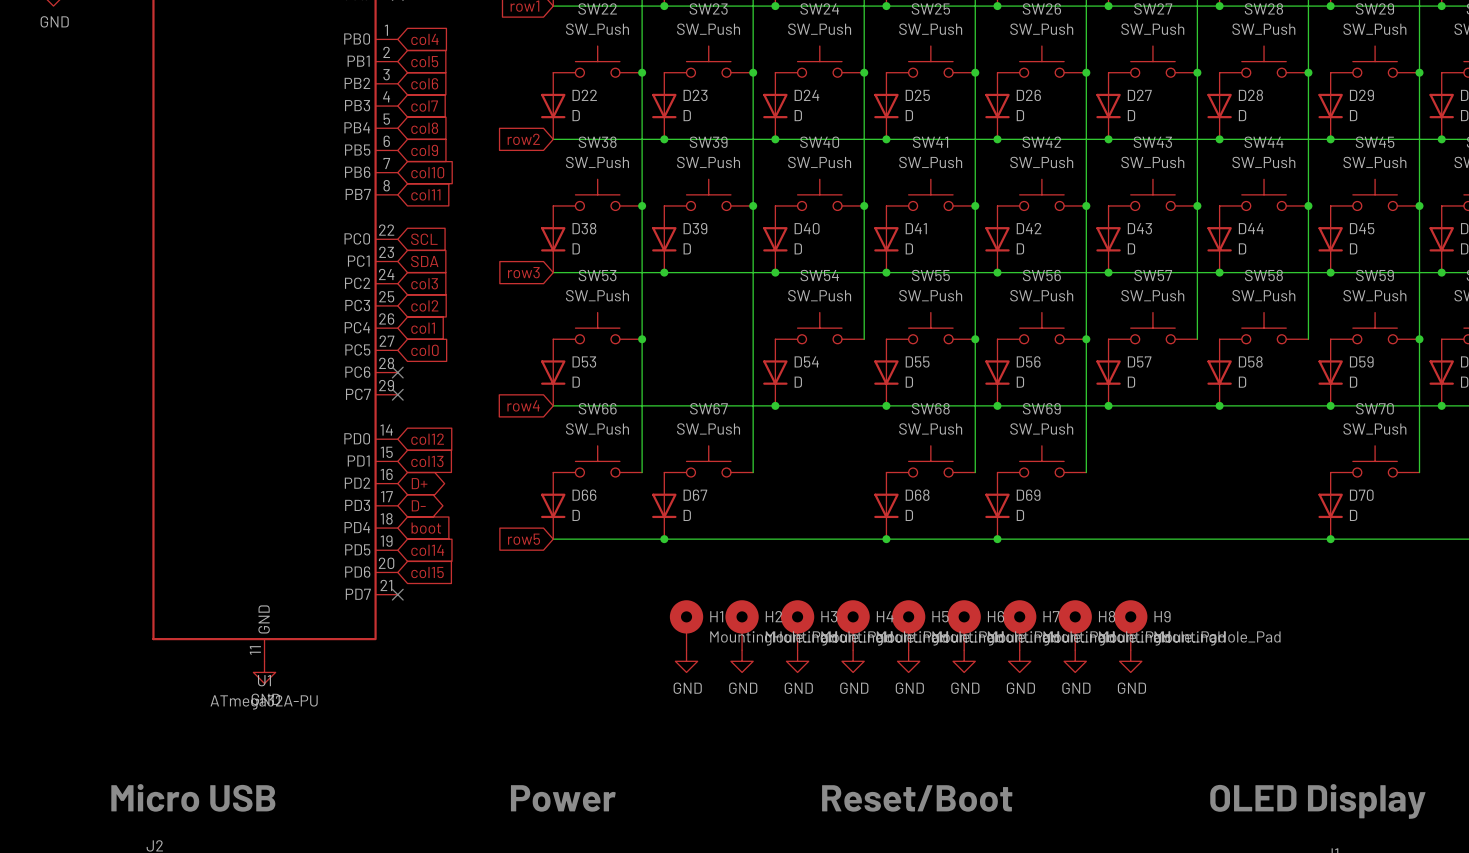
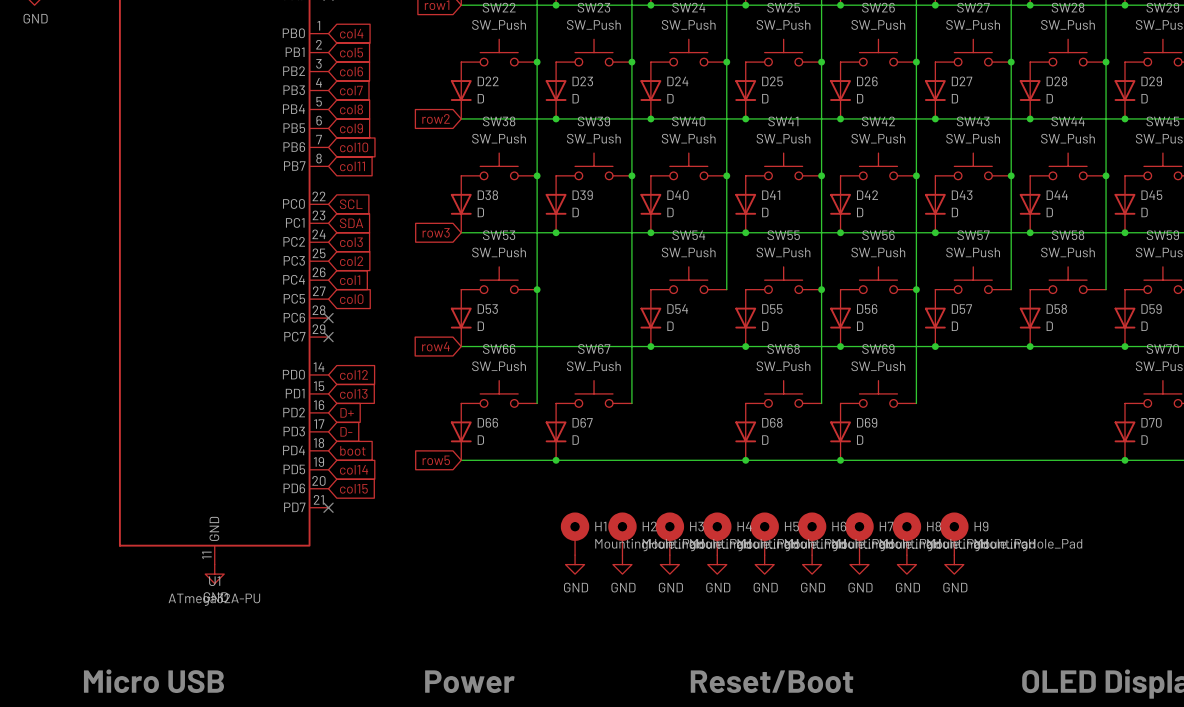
global label shape: bidirectional (419, 483) -> input (347, 412)
global label shape: bidirectional (418, 505) -> input (346, 431)

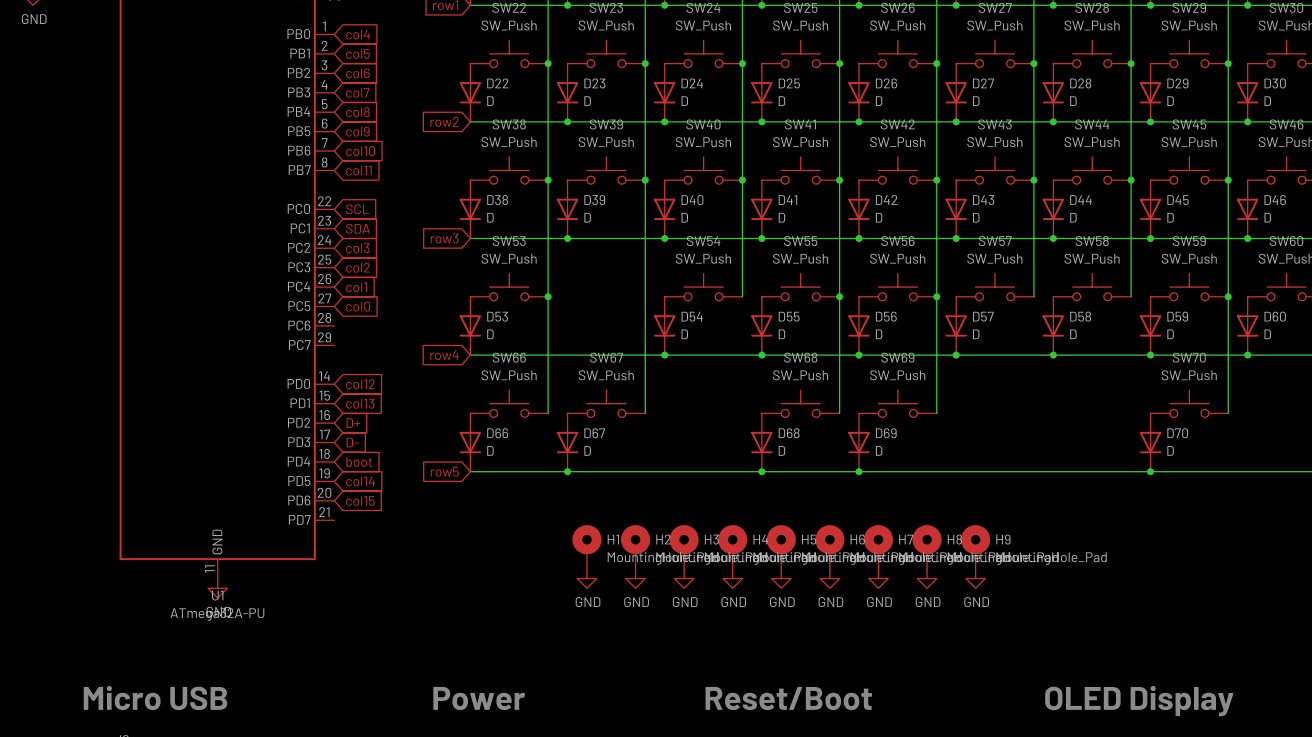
no-connect mark: (328, 318) -> none
no-connect mark: (328, 337) -> none
no-connect mark: (328, 507) -> none

